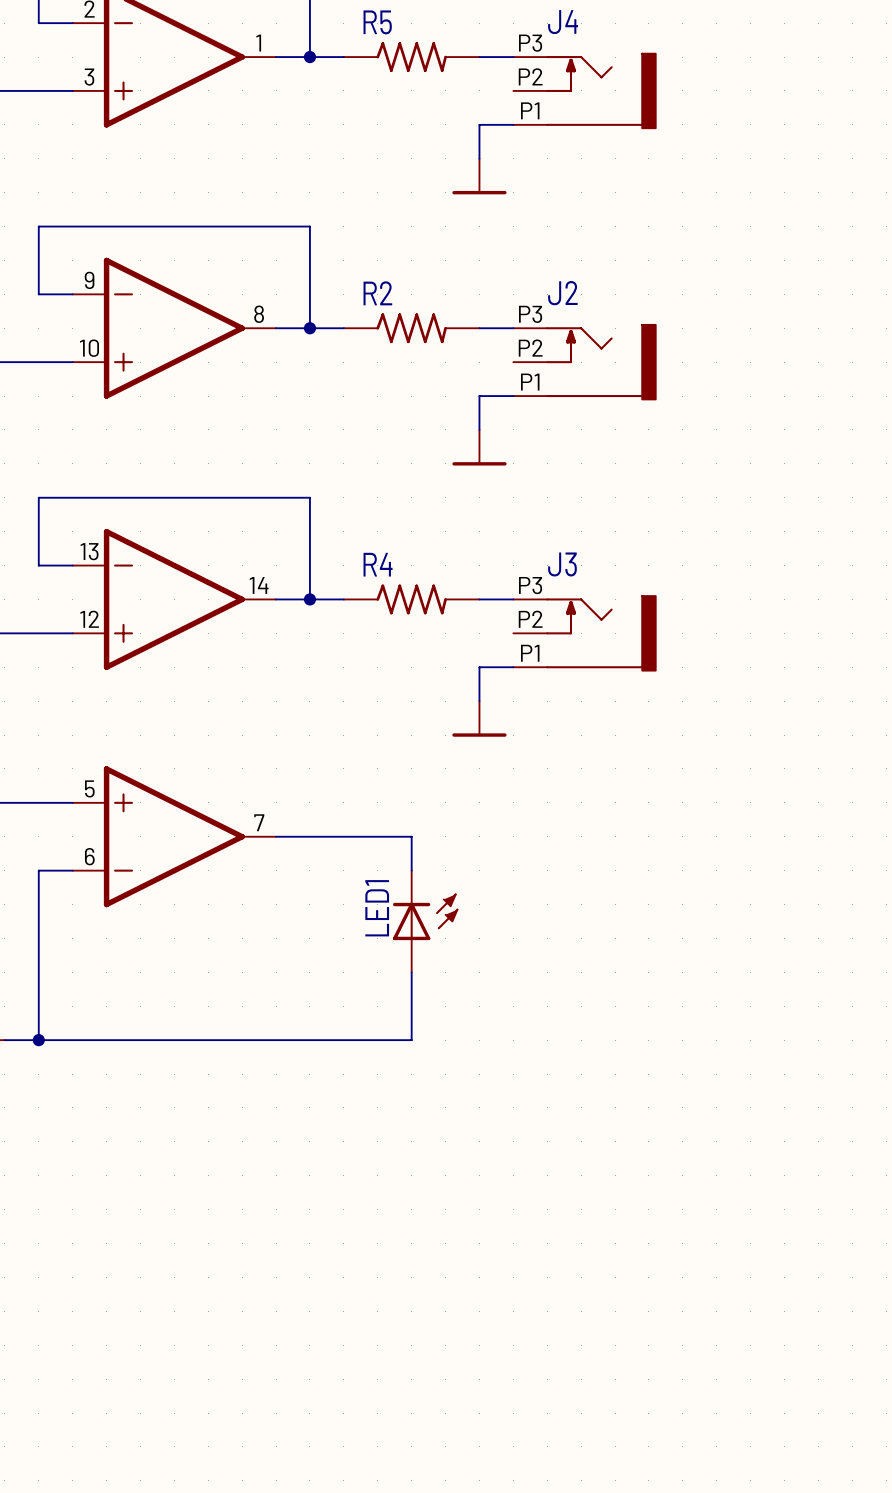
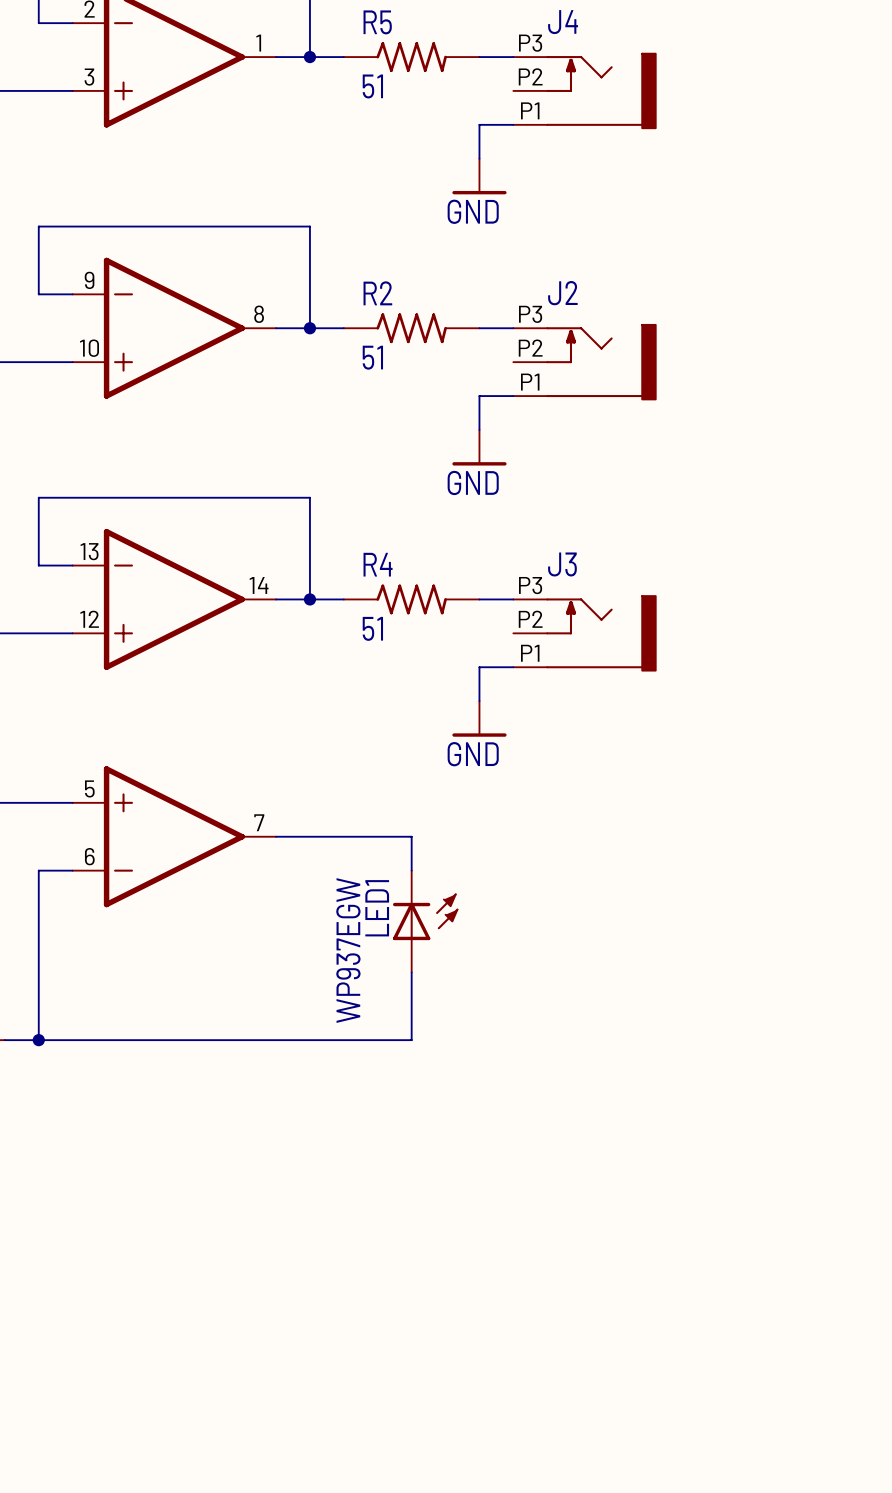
R5 value: none -> 51 (372, 86)
power symbol text: none -> GND (473, 211)
R2 value: none -> 51 (372, 357)
power symbol text: none -> GND (473, 482)
R4 value: none -> 51 (372, 628)
power symbol text: none -> GND (473, 754)
LED1 value: none -> WP937EGW (348, 950)

